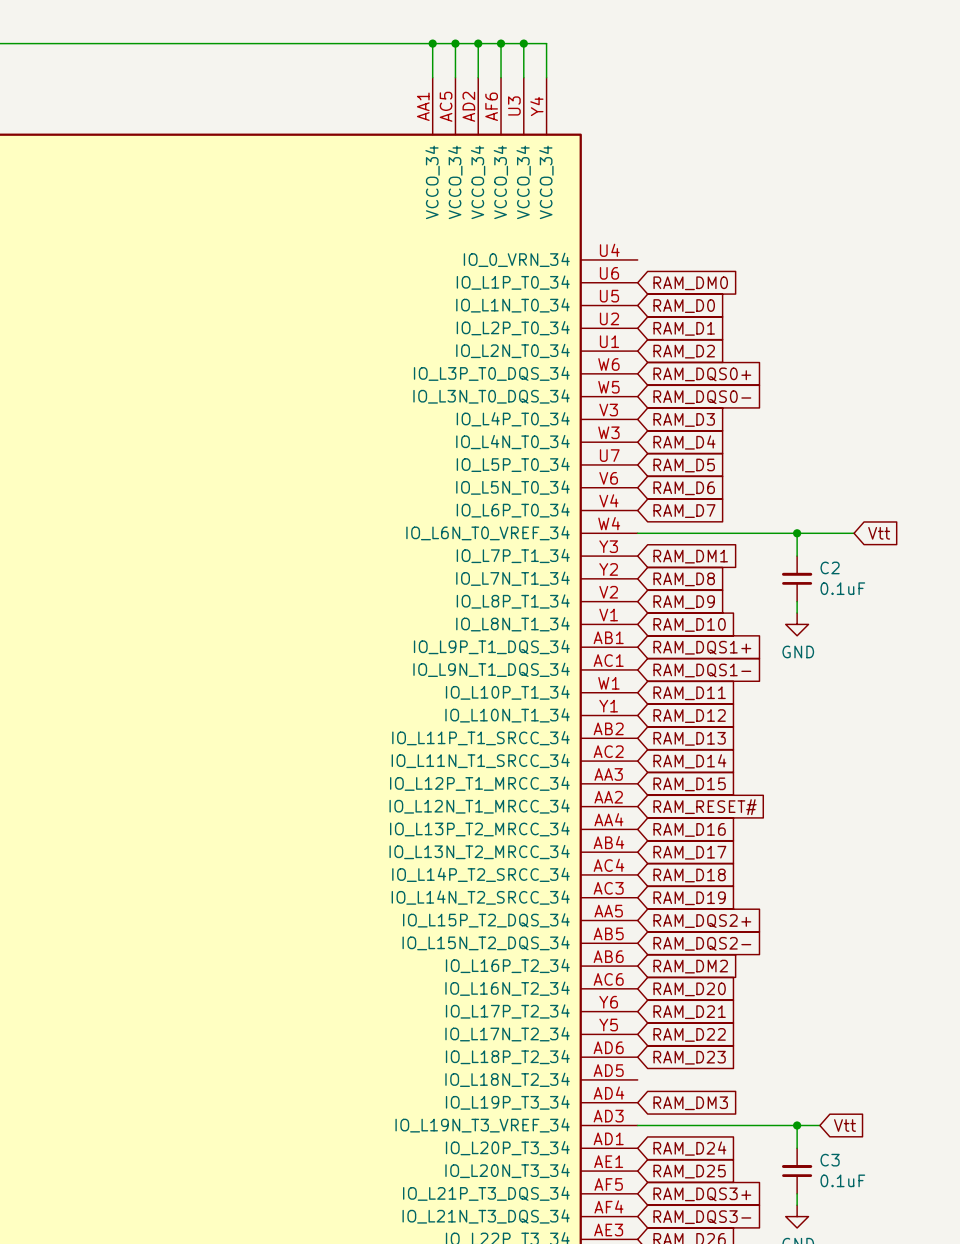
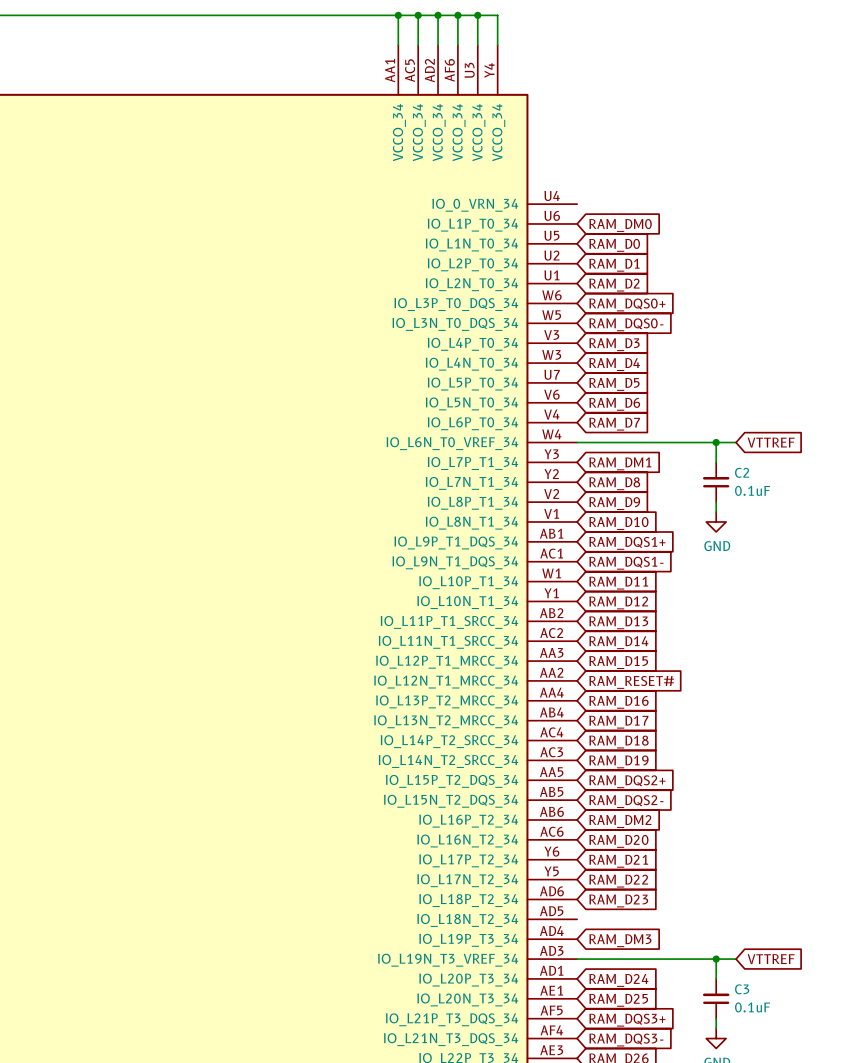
wire: (819, 533) (854, 533) -> none
global label: none -> VTTREF (771, 442)
global label: Vtt (879, 533) -> none
global label: Vtt (844, 1125) -> VTTREF (771, 959)

